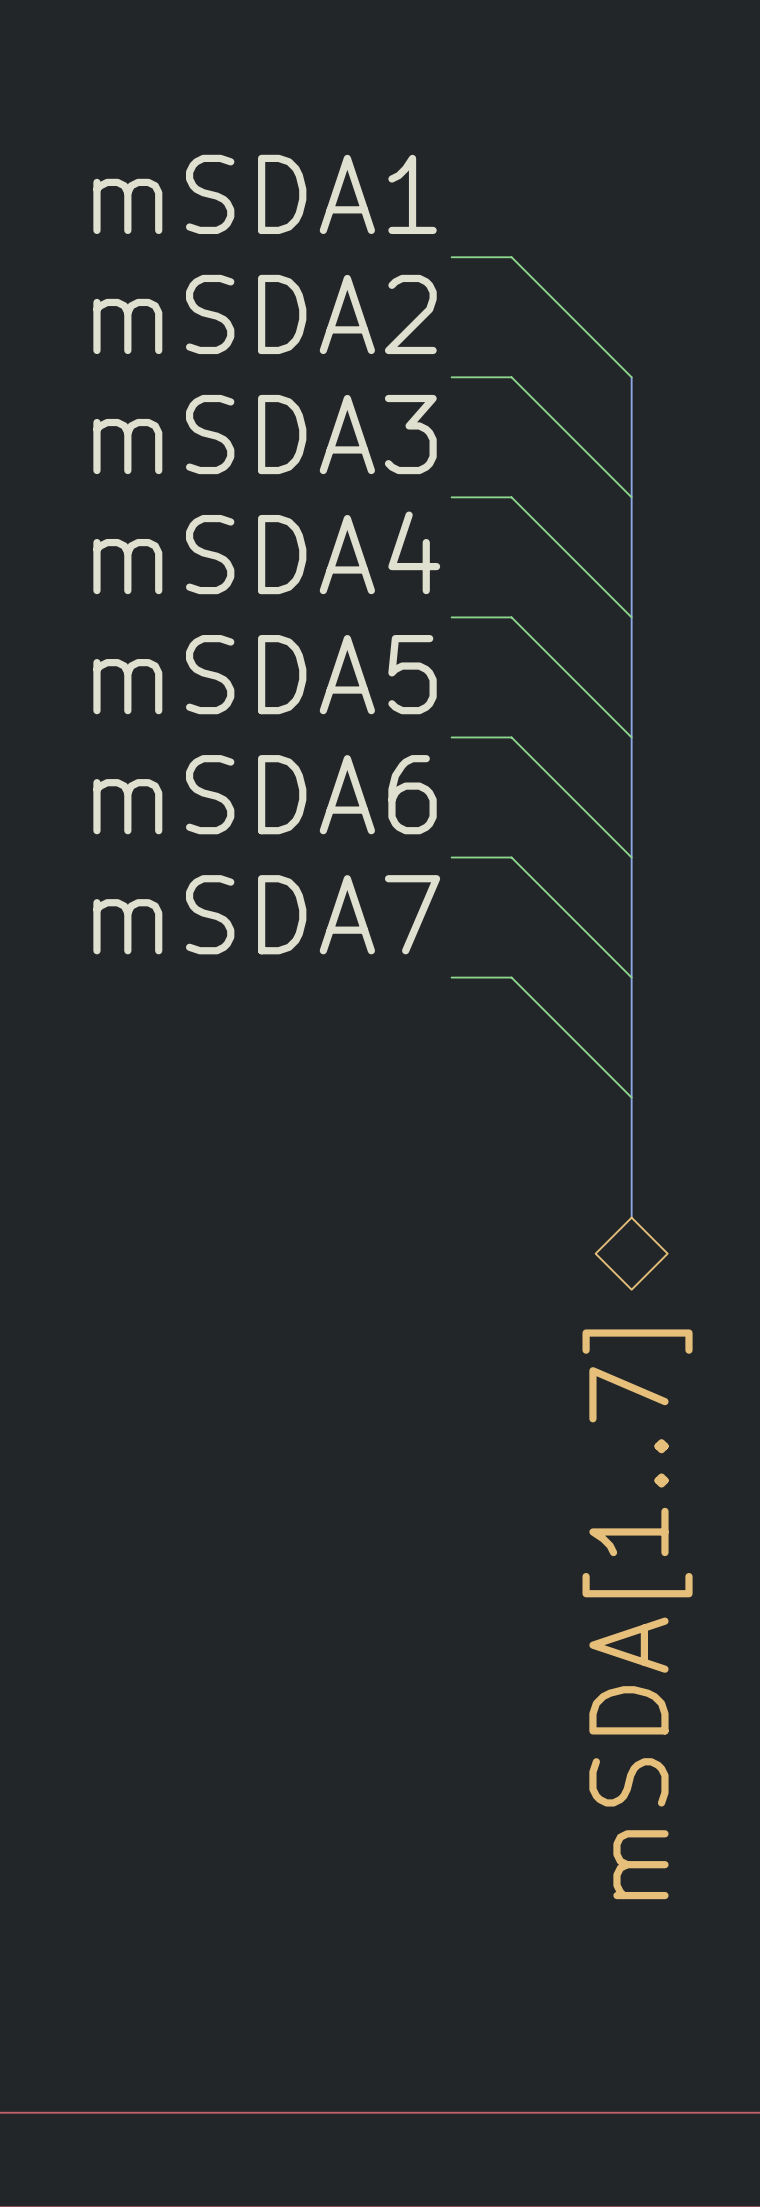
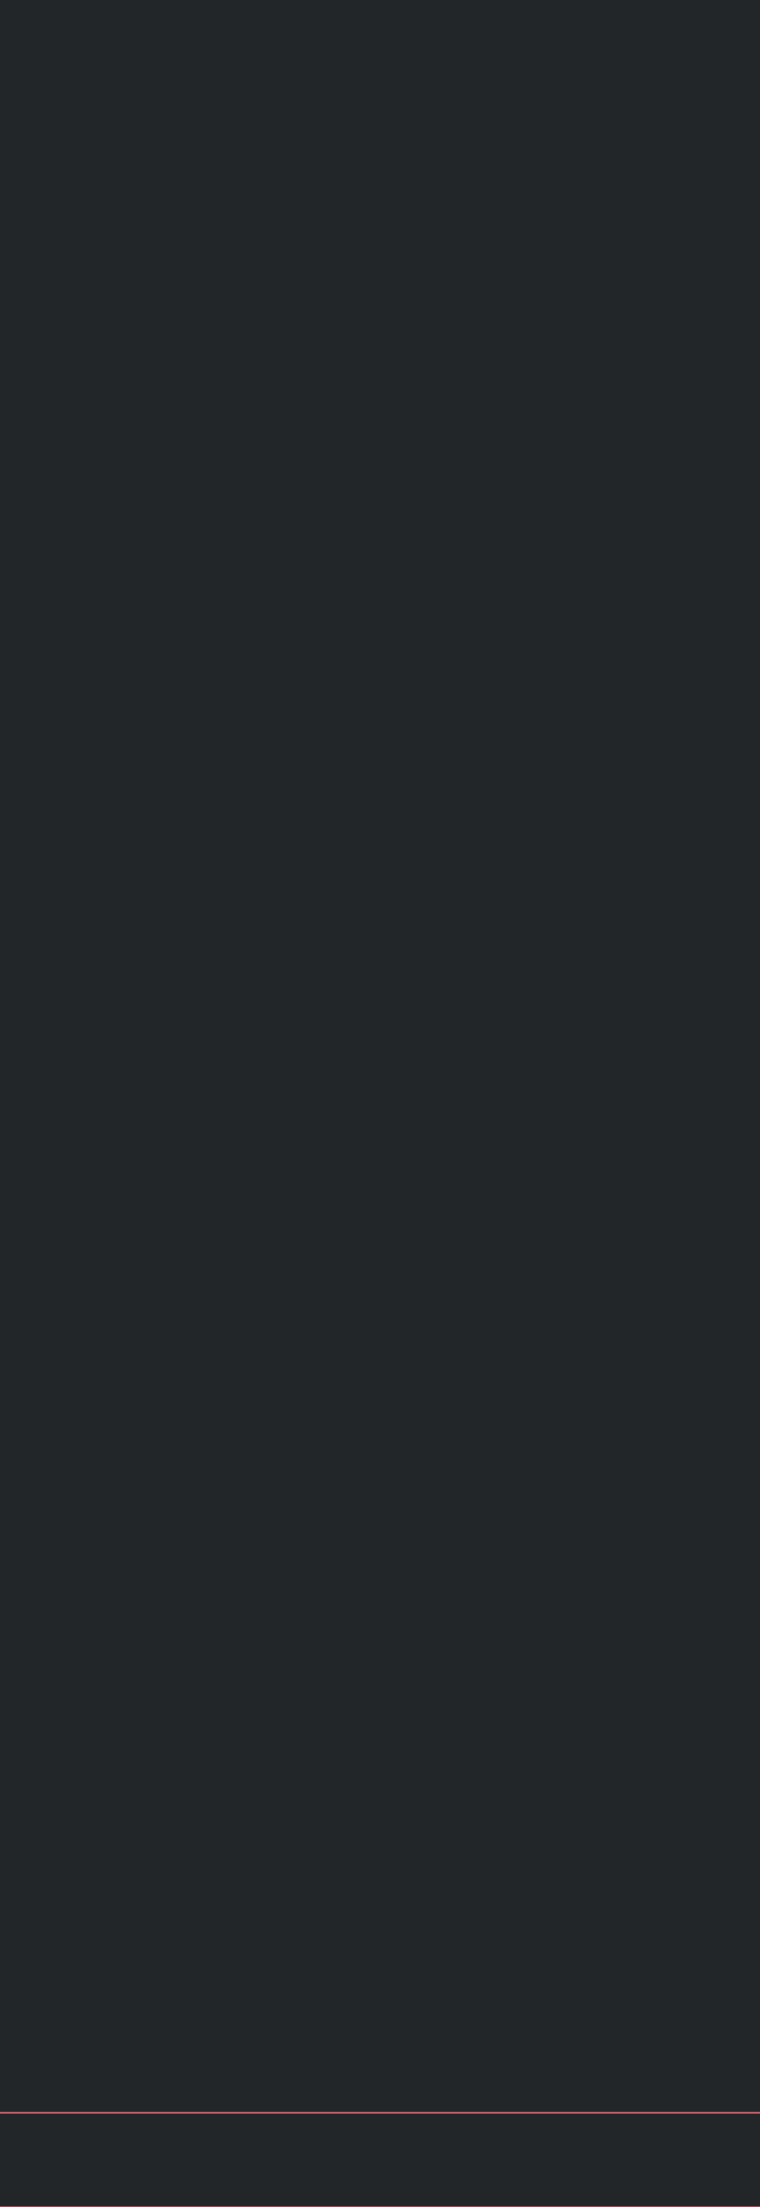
label: mSDA1 (265, 194) -> none
wire: (451, 257) (511, 257) (631, 377) -> none
label: mSDA2 (265, 314) -> none
wire: (451, 377) (511, 377) (631, 497) -> none
bus: (631, 377) (631, 1217) -> none
label: mSDA3 (265, 434) -> none
wire: (451, 497) (511, 497) (631, 617) -> none
label: mSDA4 (266, 552) -> none
wire: (451, 617) (511, 617) (631, 737) -> none
label: mSDA5 (265, 674) -> none
wire: (451, 737) (511, 737) (631, 857) -> none
label: mSDA6 (265, 794) -> none
wire: (451, 857) (511, 857) (631, 977) -> none
label: mSDA7 (266, 914) -> none
wire: (451, 977) (511, 977) (631, 1097) -> none
hierarchical label: mSDA[1..7] (637, 1614) -> none

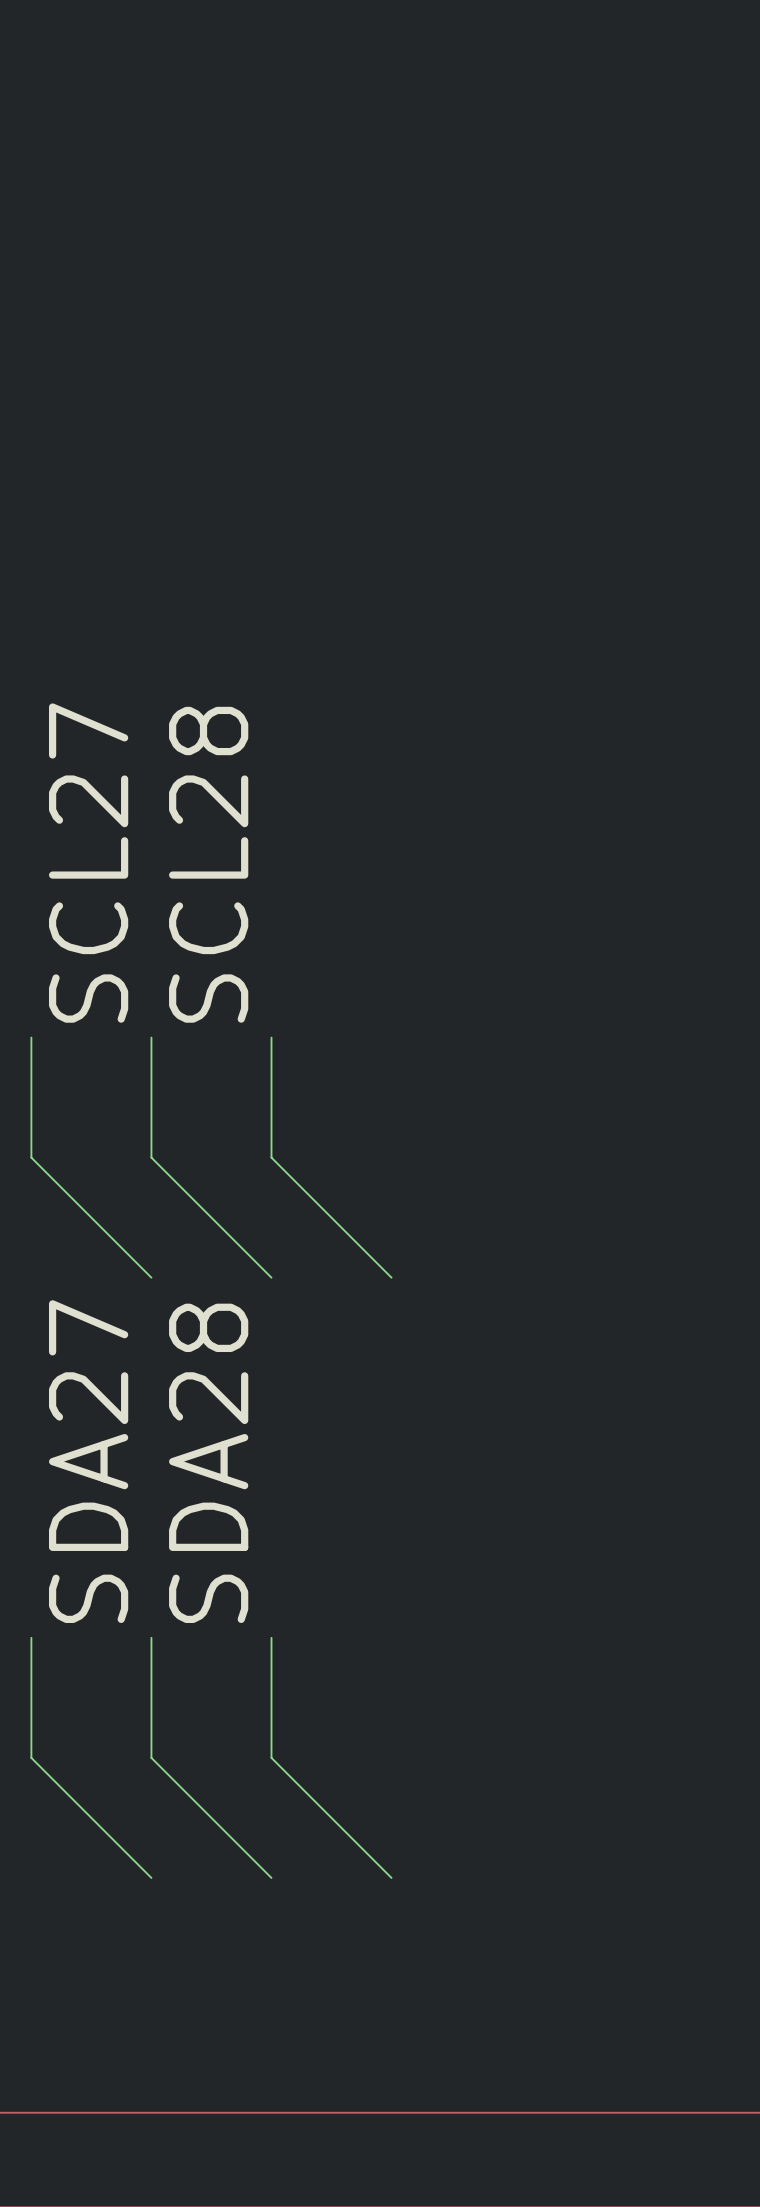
label: none -> SCL27 (88, 863)
label: none -> SCL28 (208, 864)
wire: none -> (31, 1037) (31, 1157) (151, 1277)
wire: none -> (151, 1037) (151, 1157) (271, 1277)
wire: none -> (271, 1037) (271, 1157) (391, 1277)
label: none -> SDA27 (88, 1461)
label: none -> SDA28 (208, 1463)
wire: none -> (31, 1637) (31, 1757) (151, 1877)
wire: none -> (151, 1637) (151, 1757) (271, 1877)
wire: none -> (271, 1637) (271, 1757) (391, 1877)

